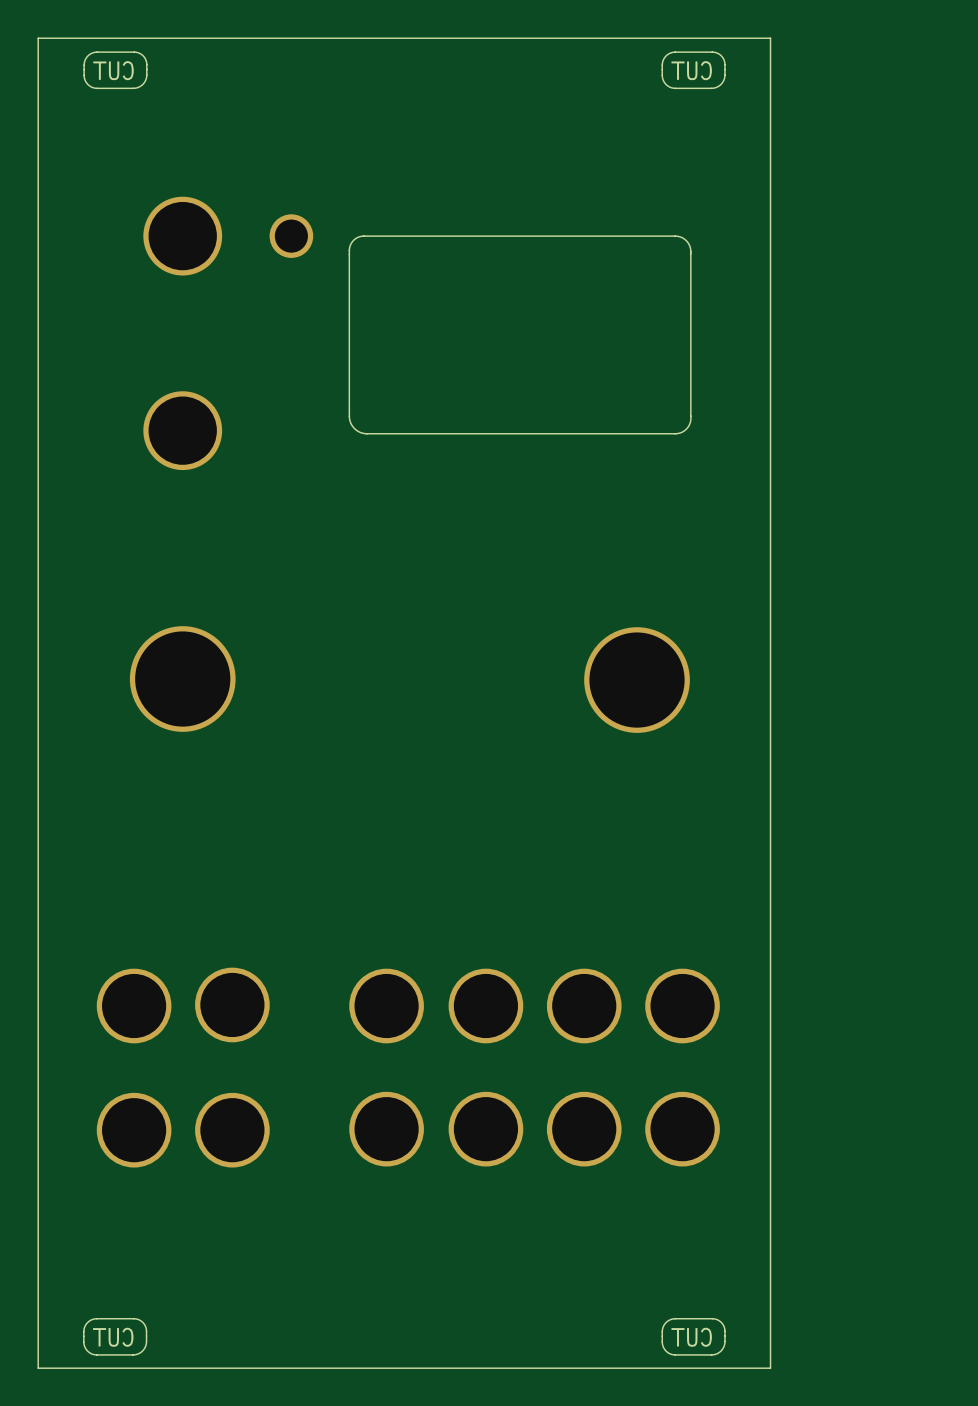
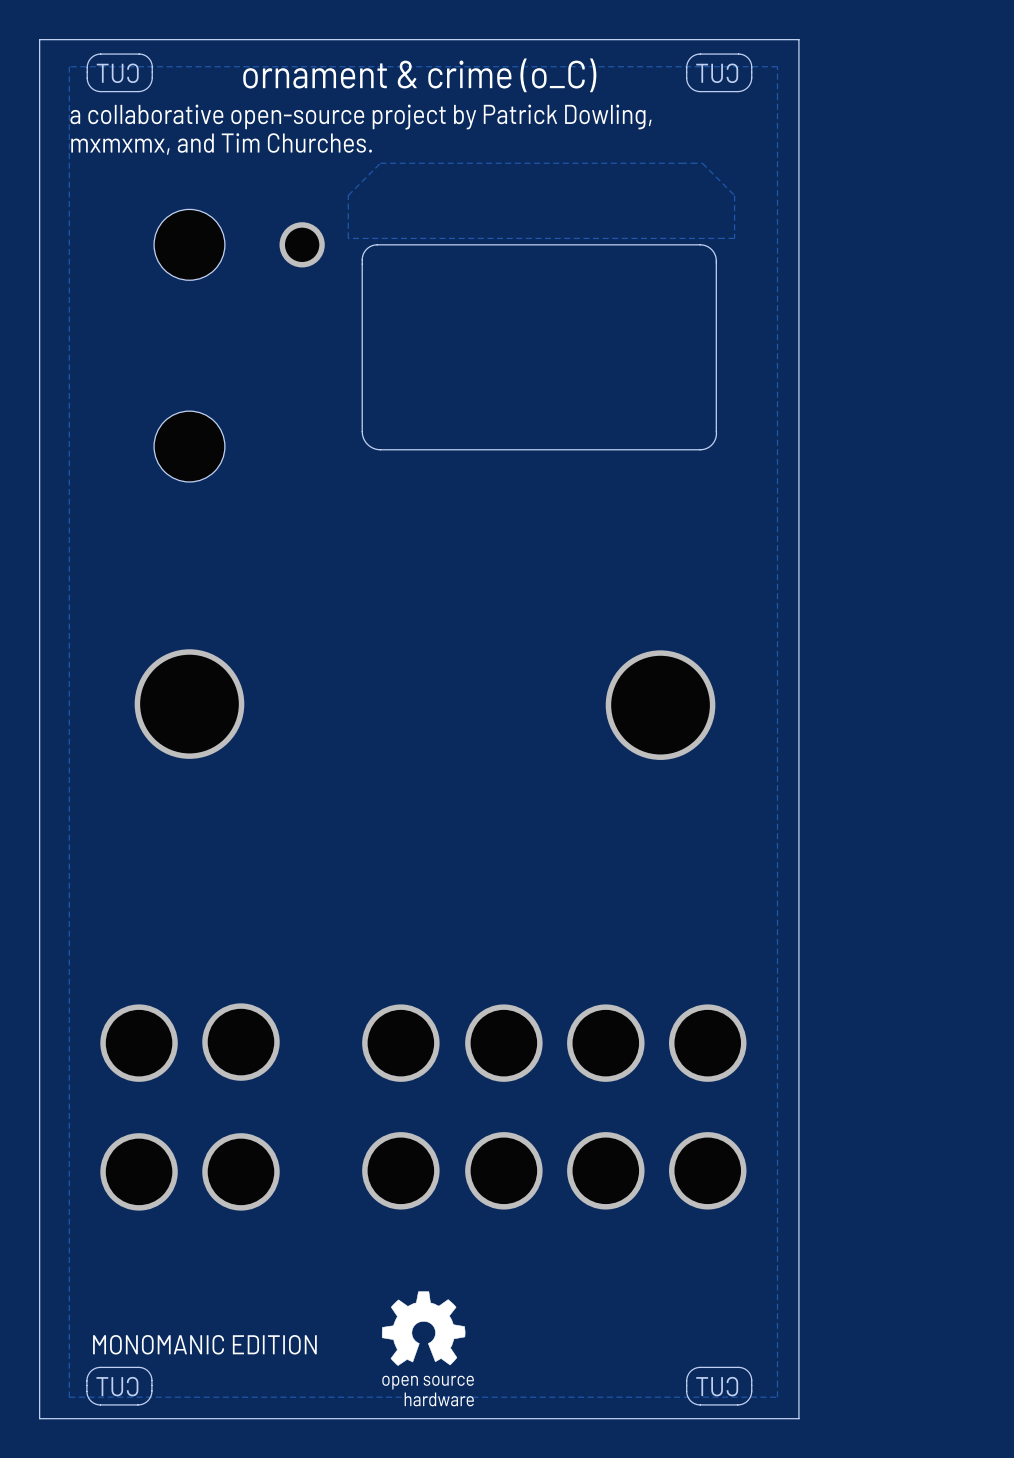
zone outline: none -> (777, 66) (777, 1397) (69, 1397) (69, 66) (777, 66)
text: none -> ornament & crime (o_C) (419, 75)
text: none -> a collaborative open-source project by Patrick Dowling, (361, 117)
text: none -> mxmxmx, and Tim Churches. (221, 143)
zone outline: none -> (702, 163) (380, 163) (348, 195) (348, 238) (734, 238) (734, 195) (702, 163)
via: (182, 236) -> none
hole: none -> (189, 244)
via: (182, 430) -> none
hole: none -> (189, 446)
drawing: none -> [381, 1291, 466, 1366]
text: none -> MONOMANIC EDITION (204, 1344)

